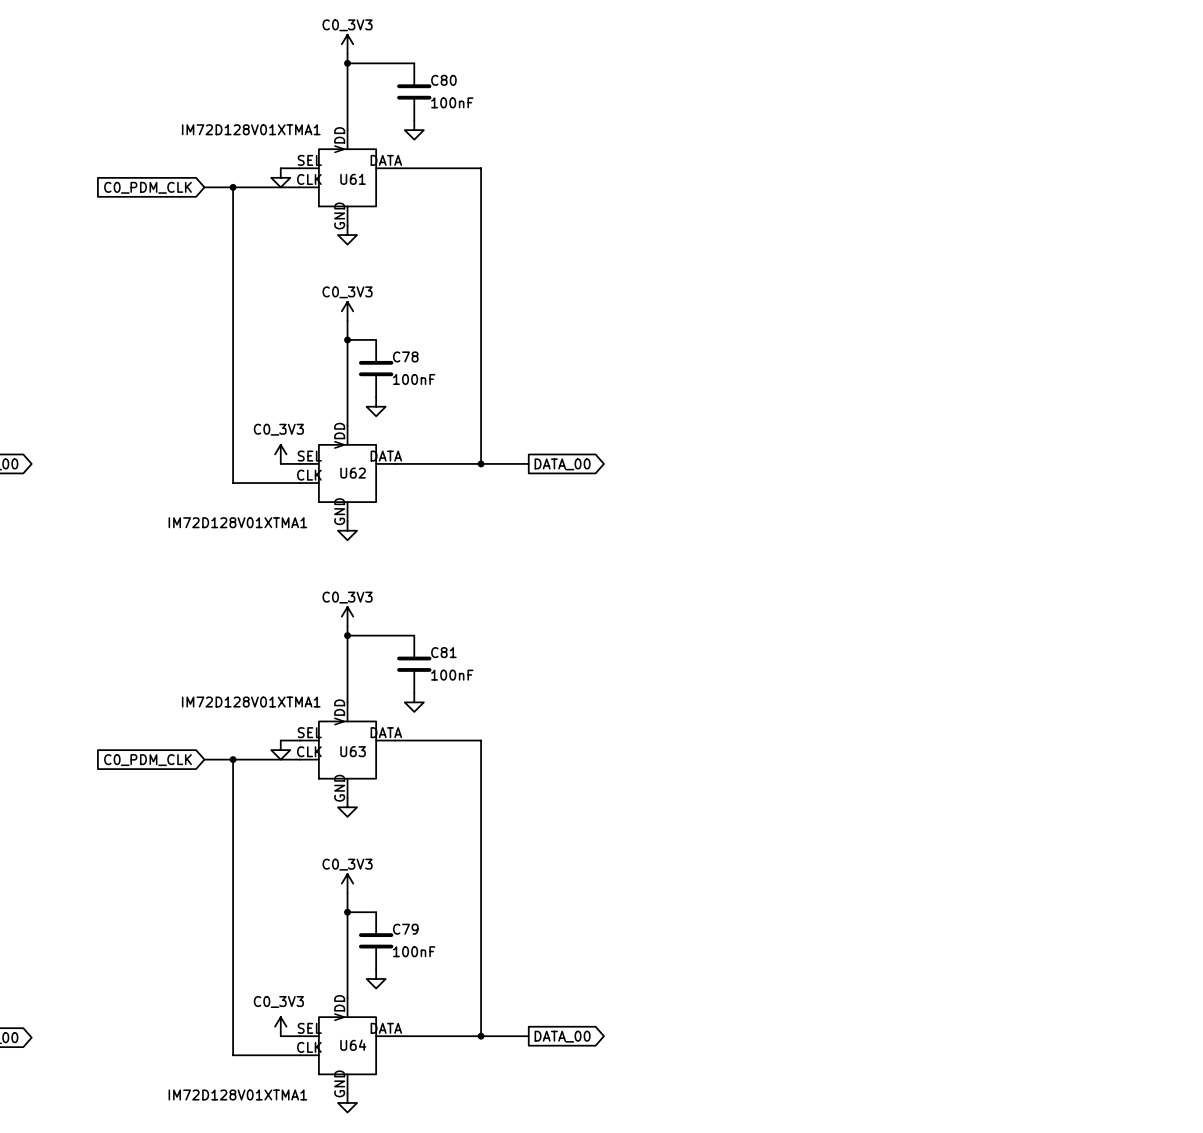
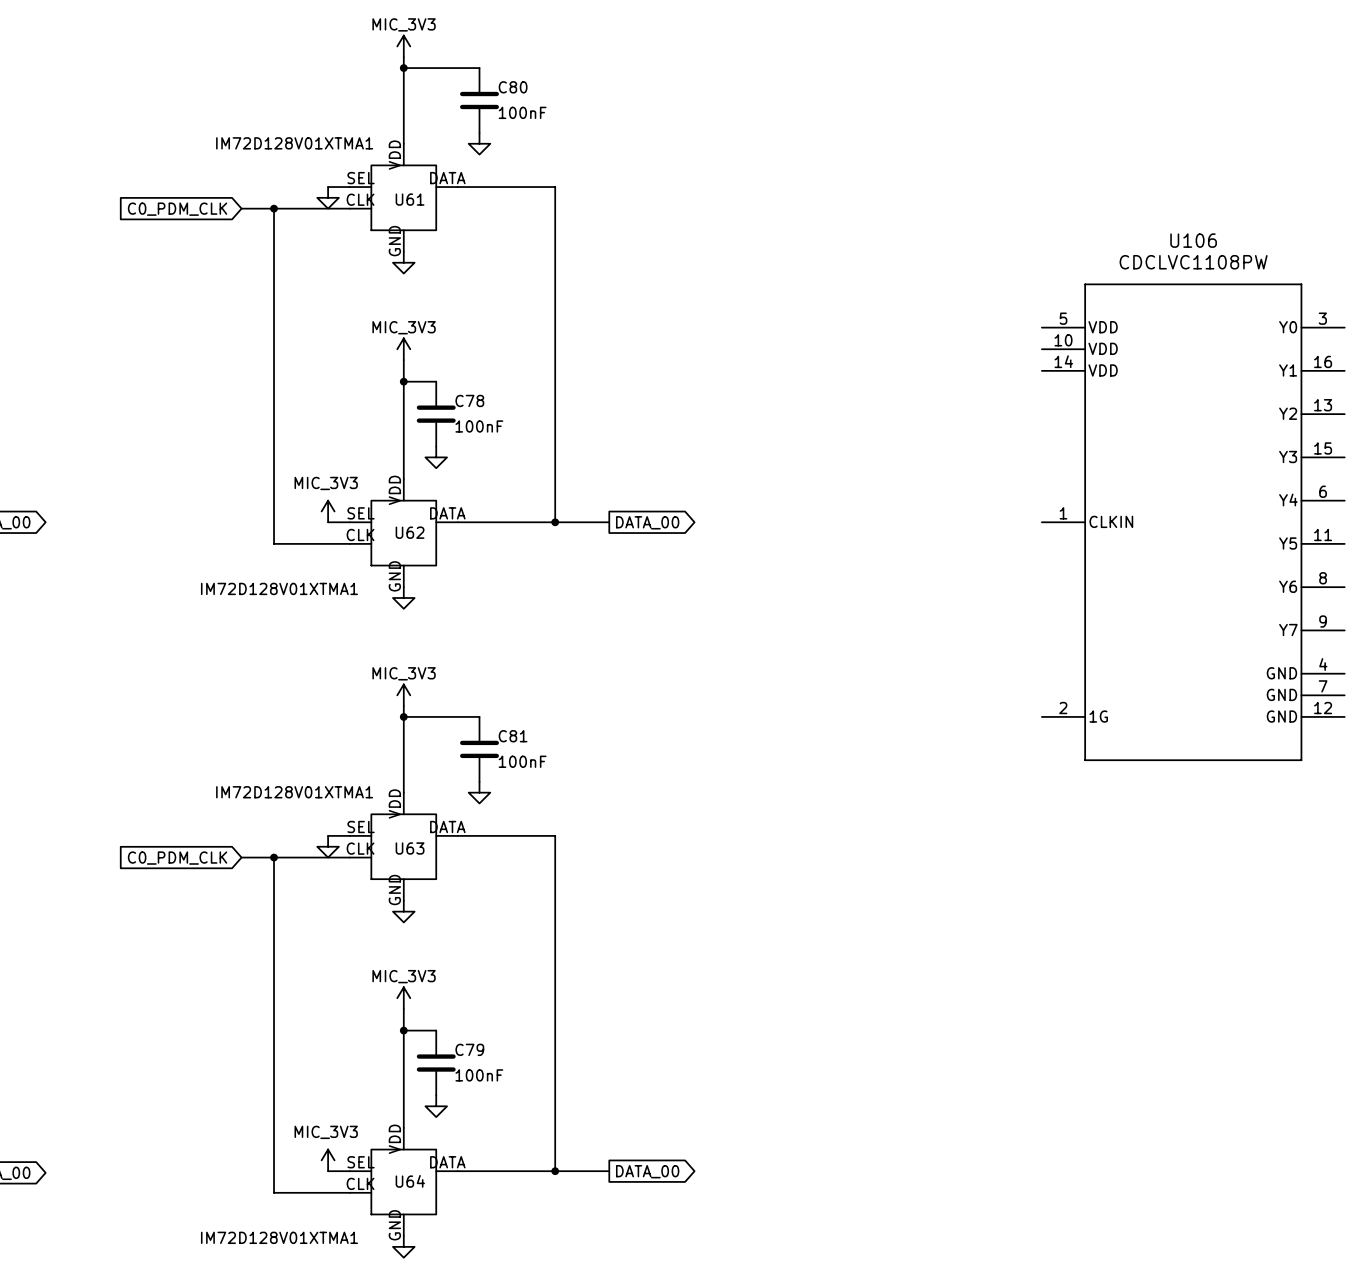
power symbol: C0_3V3 (347, 44) -> MIC_3V3 (403, 46)
power symbol: C0_3V3 (347, 311) -> MIC_3V3 (403, 349)
power symbol: C0_3V3 (280, 454) -> MIC_3V3 (328, 511)
U106: none -> CDCLVC1108PW (1193, 522)
power symbol: C0_3V3 (347, 616) -> MIC_3V3 (403, 695)
power symbol: C0_3V3 (347, 883) -> MIC_3V3 (403, 998)
power symbol: C0_3V3 (280, 1026) -> MIC_3V3 (328, 1160)

